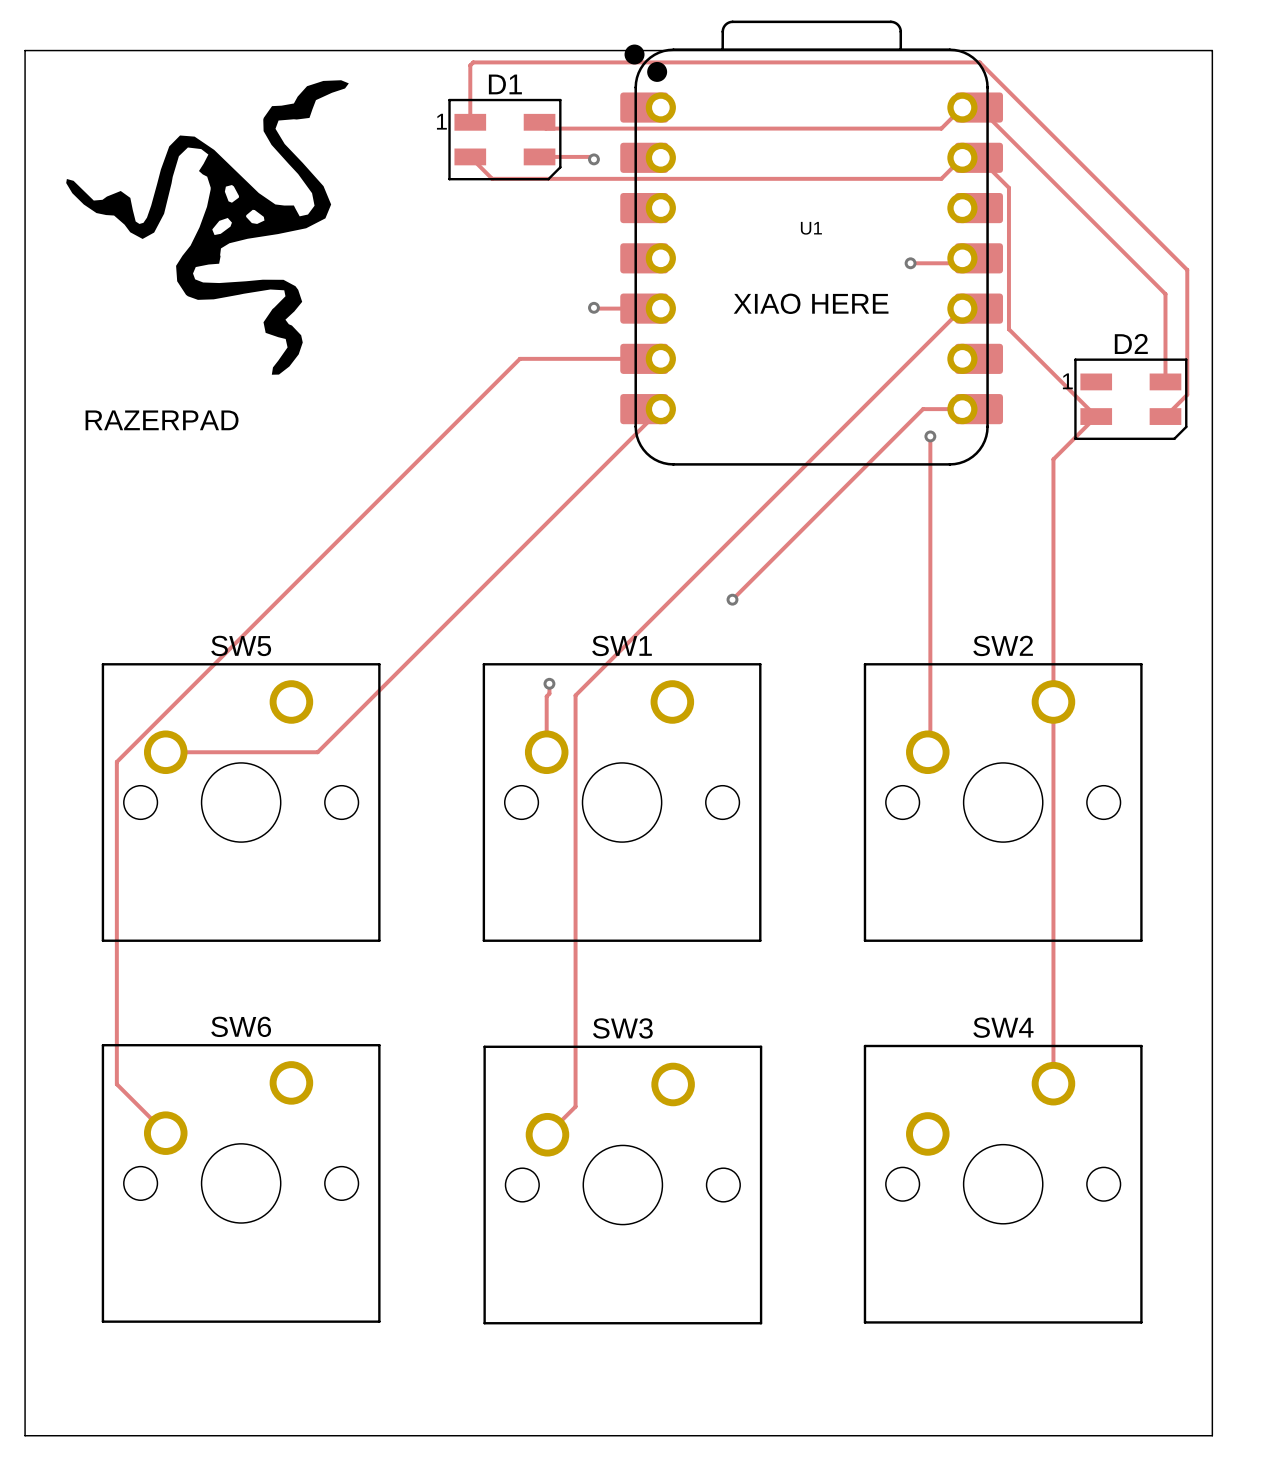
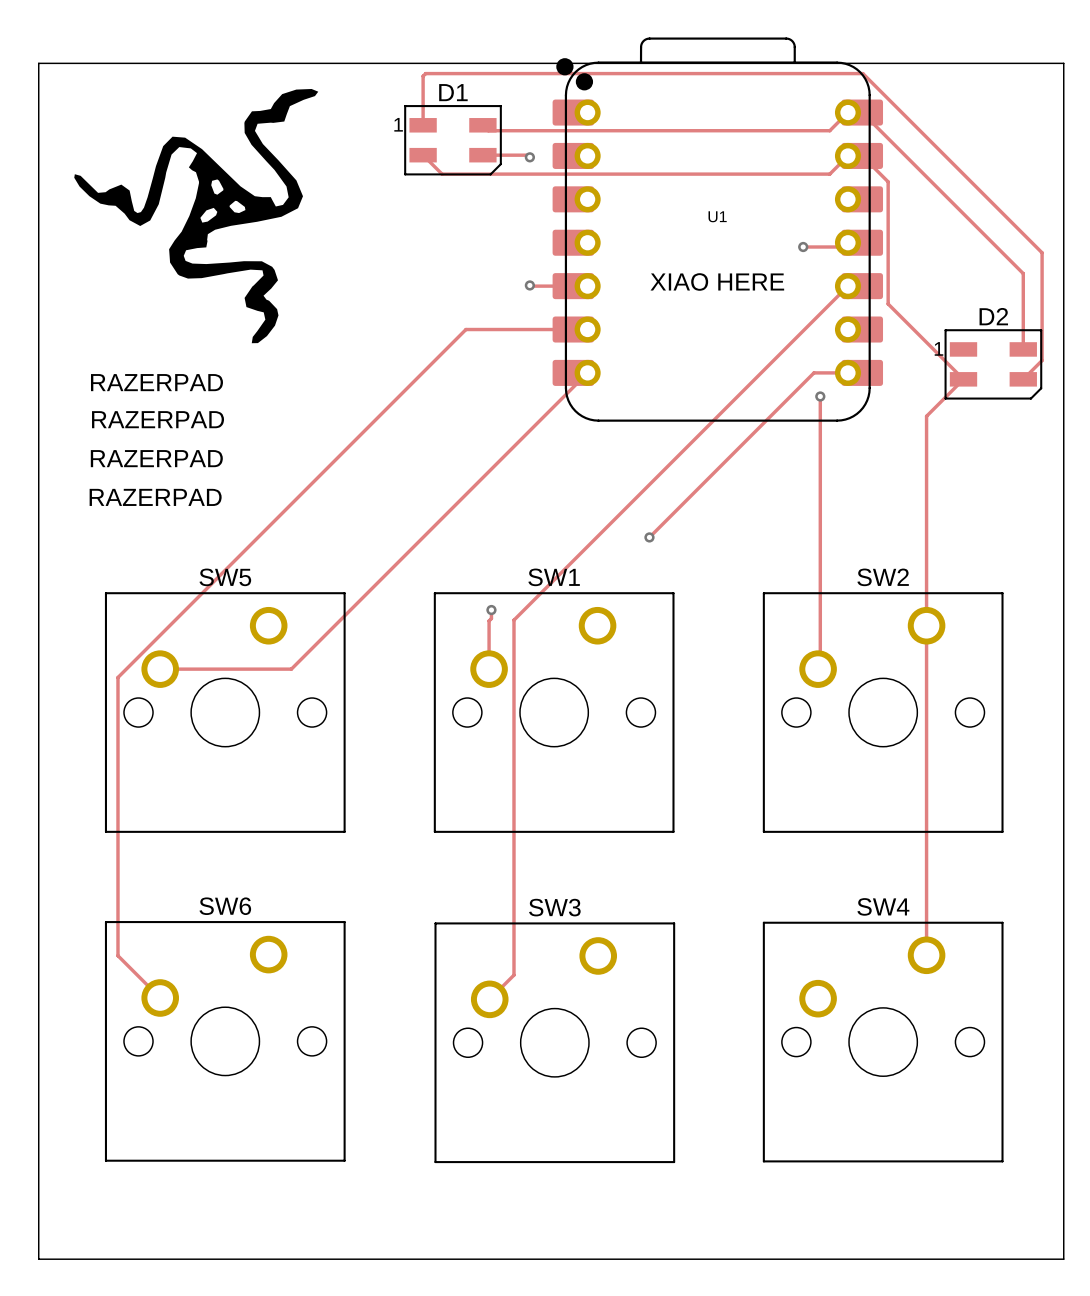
text: none -> RAZERPAD (158, 419)
text: none -> RAZERPAD (156, 458)
text: none -> RAZERPAD (155, 497)

